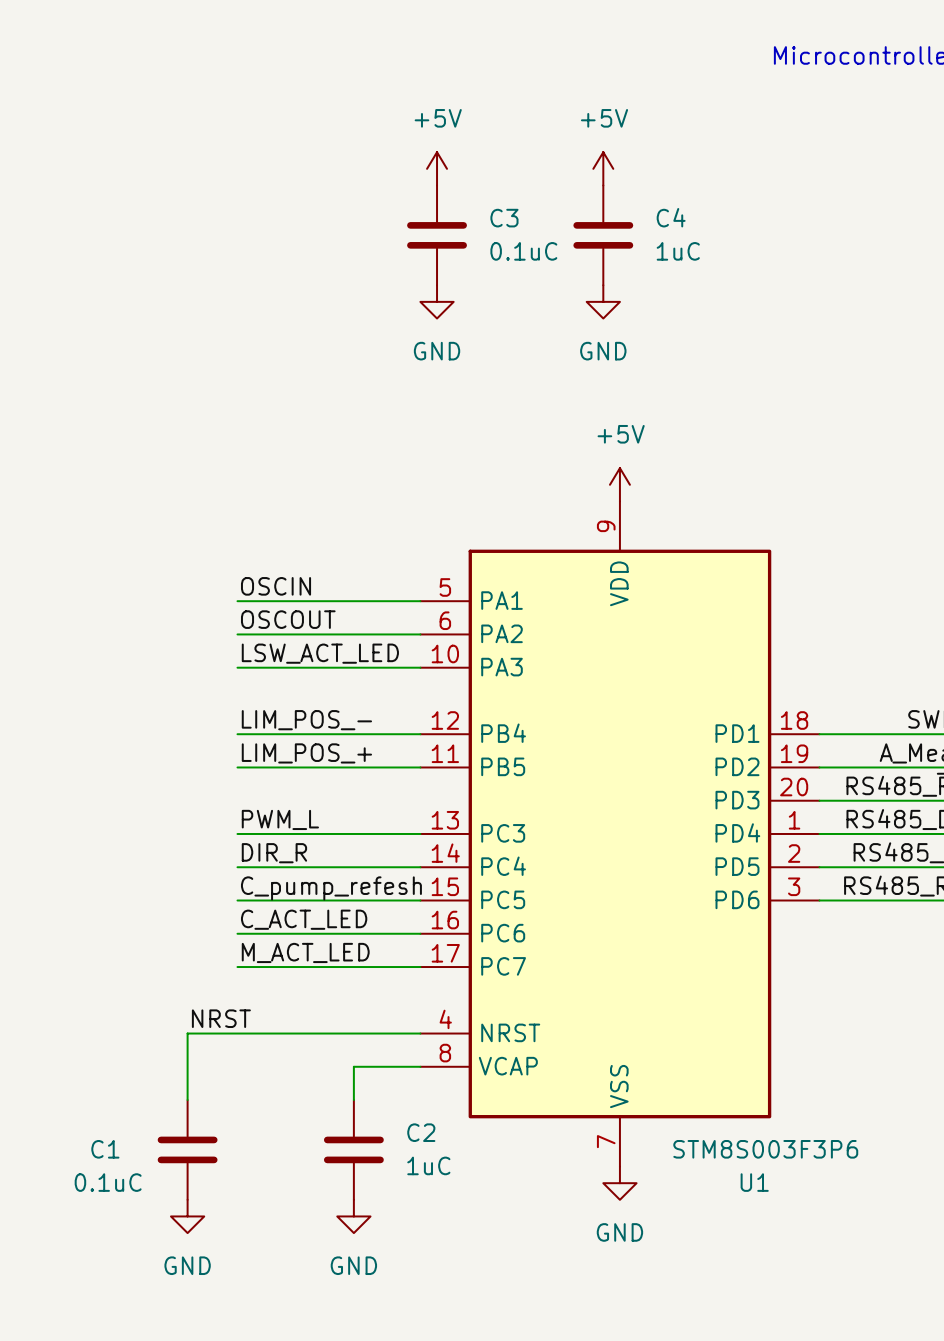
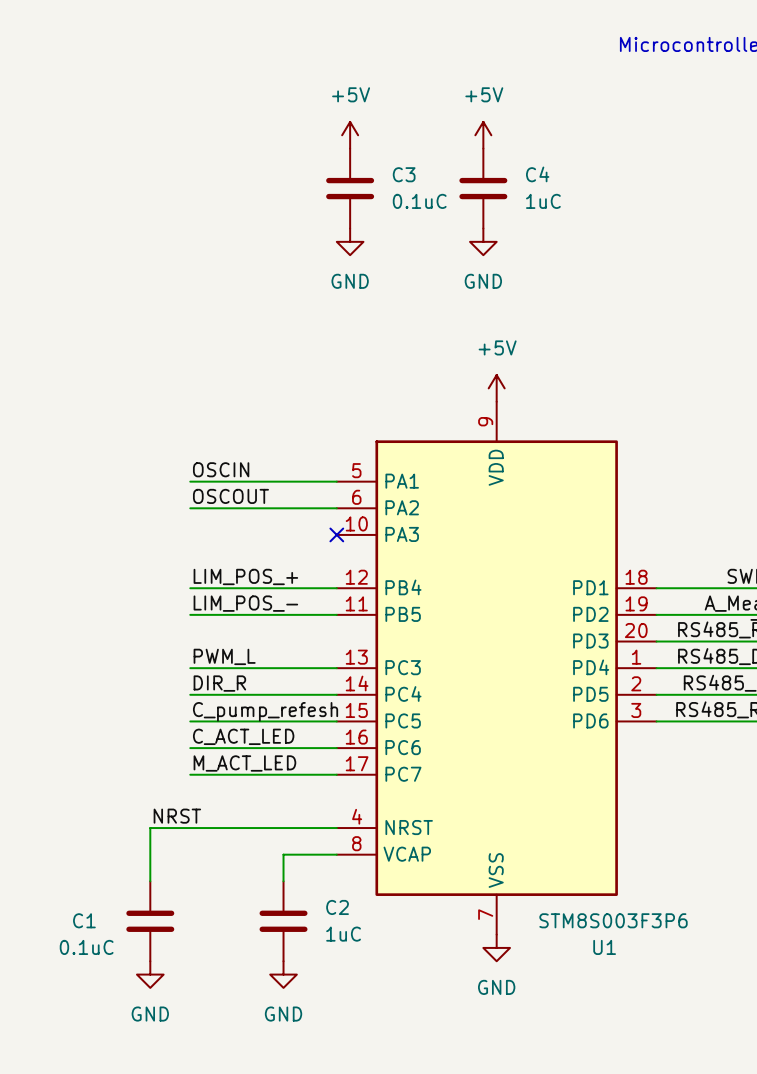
label: LSW_ACT_LED (320, 653) -> none
wire: (237, 667) (420, 667) -> none
no-connect mark: none -> (336, 534)
label: LIM_POS_- (306, 720) -> LIM_POS_+ (245, 576)
label: LIM_POS_+ (306, 753) -> LIM_POS_- (245, 603)

